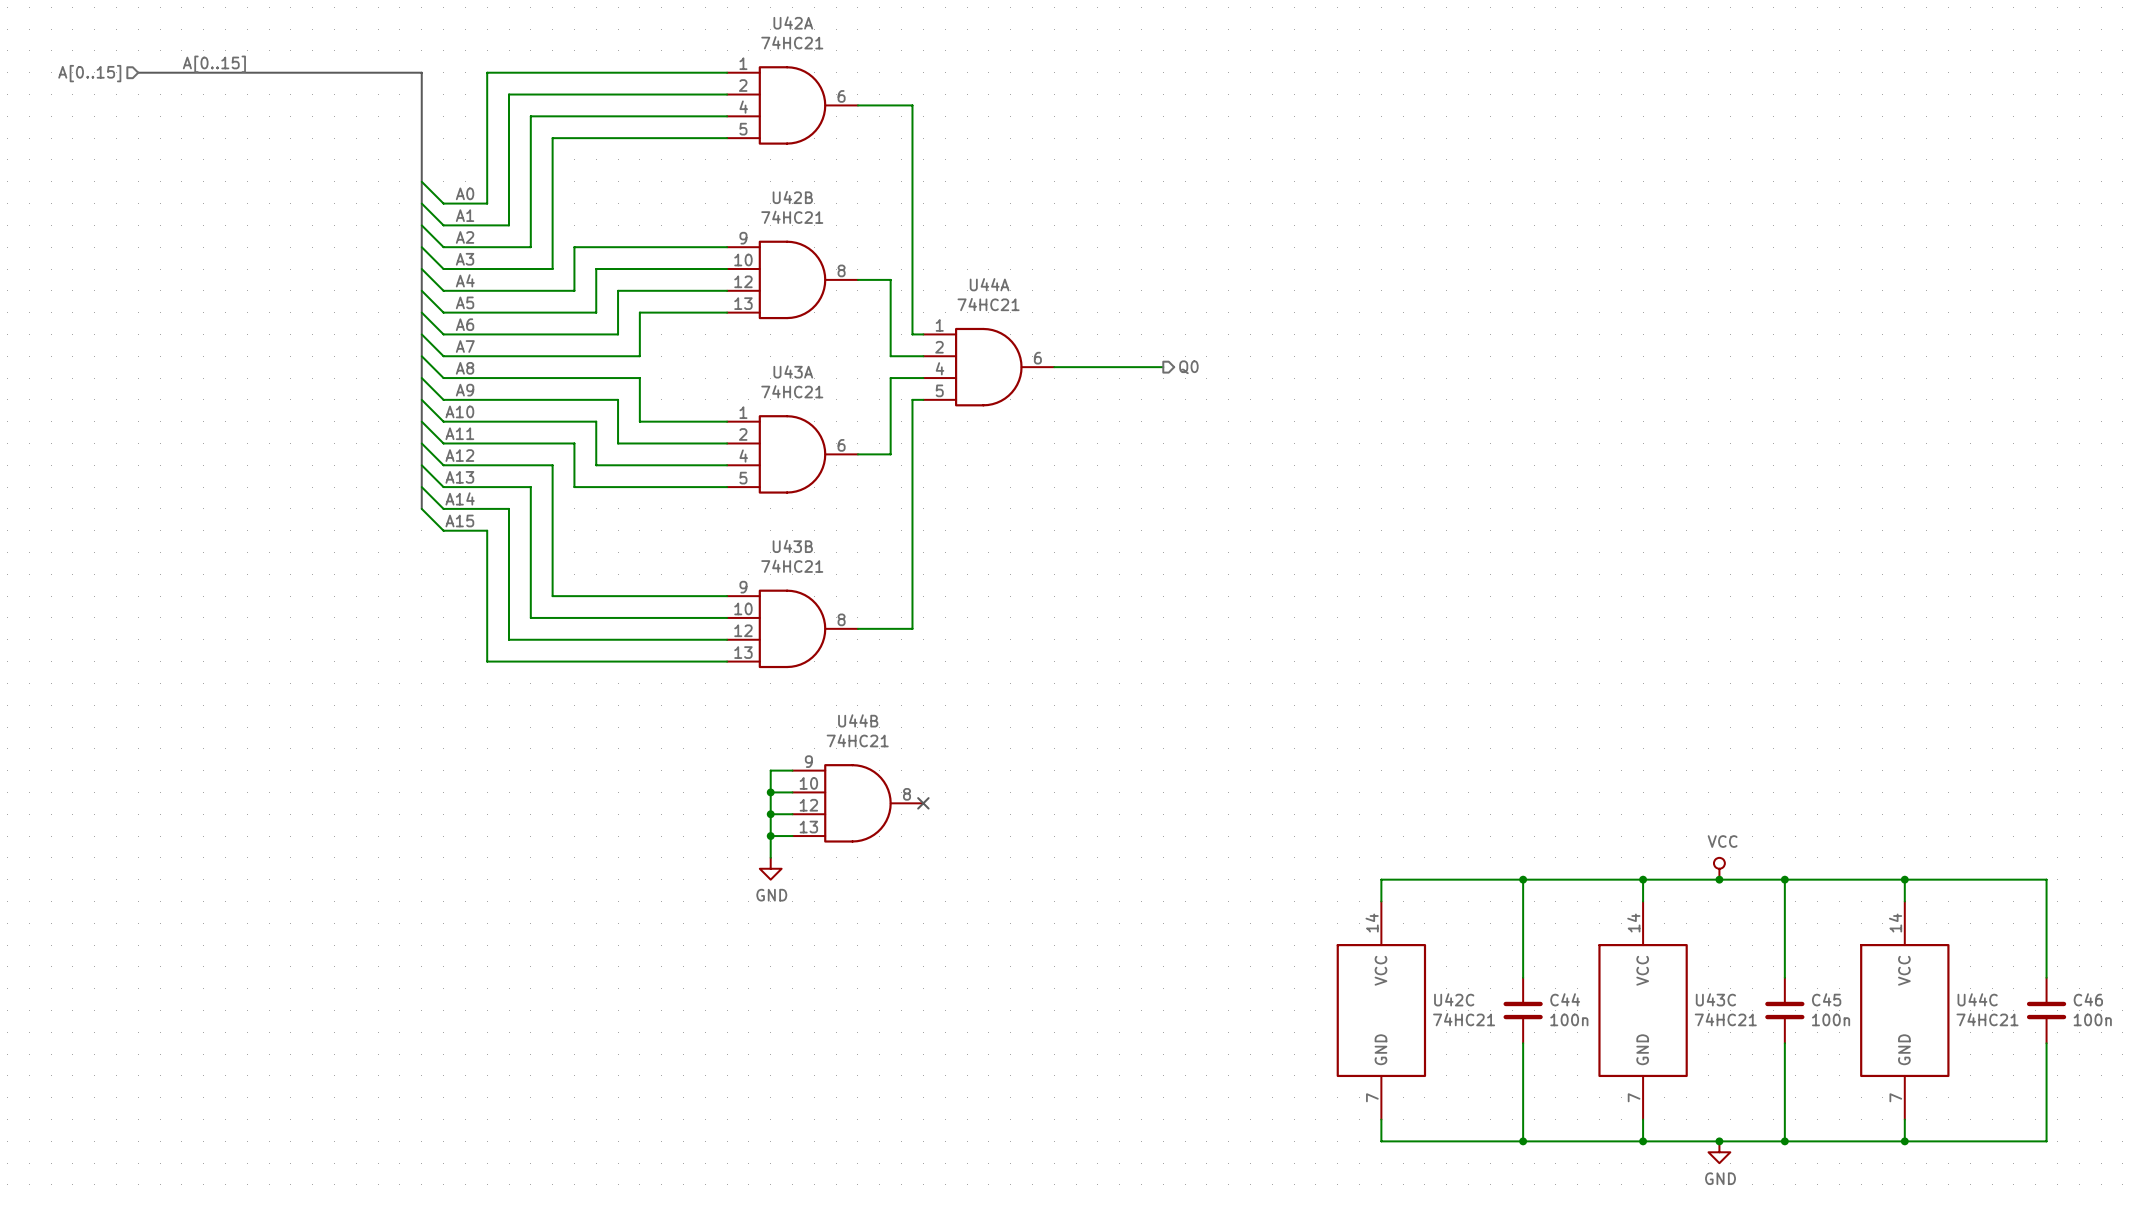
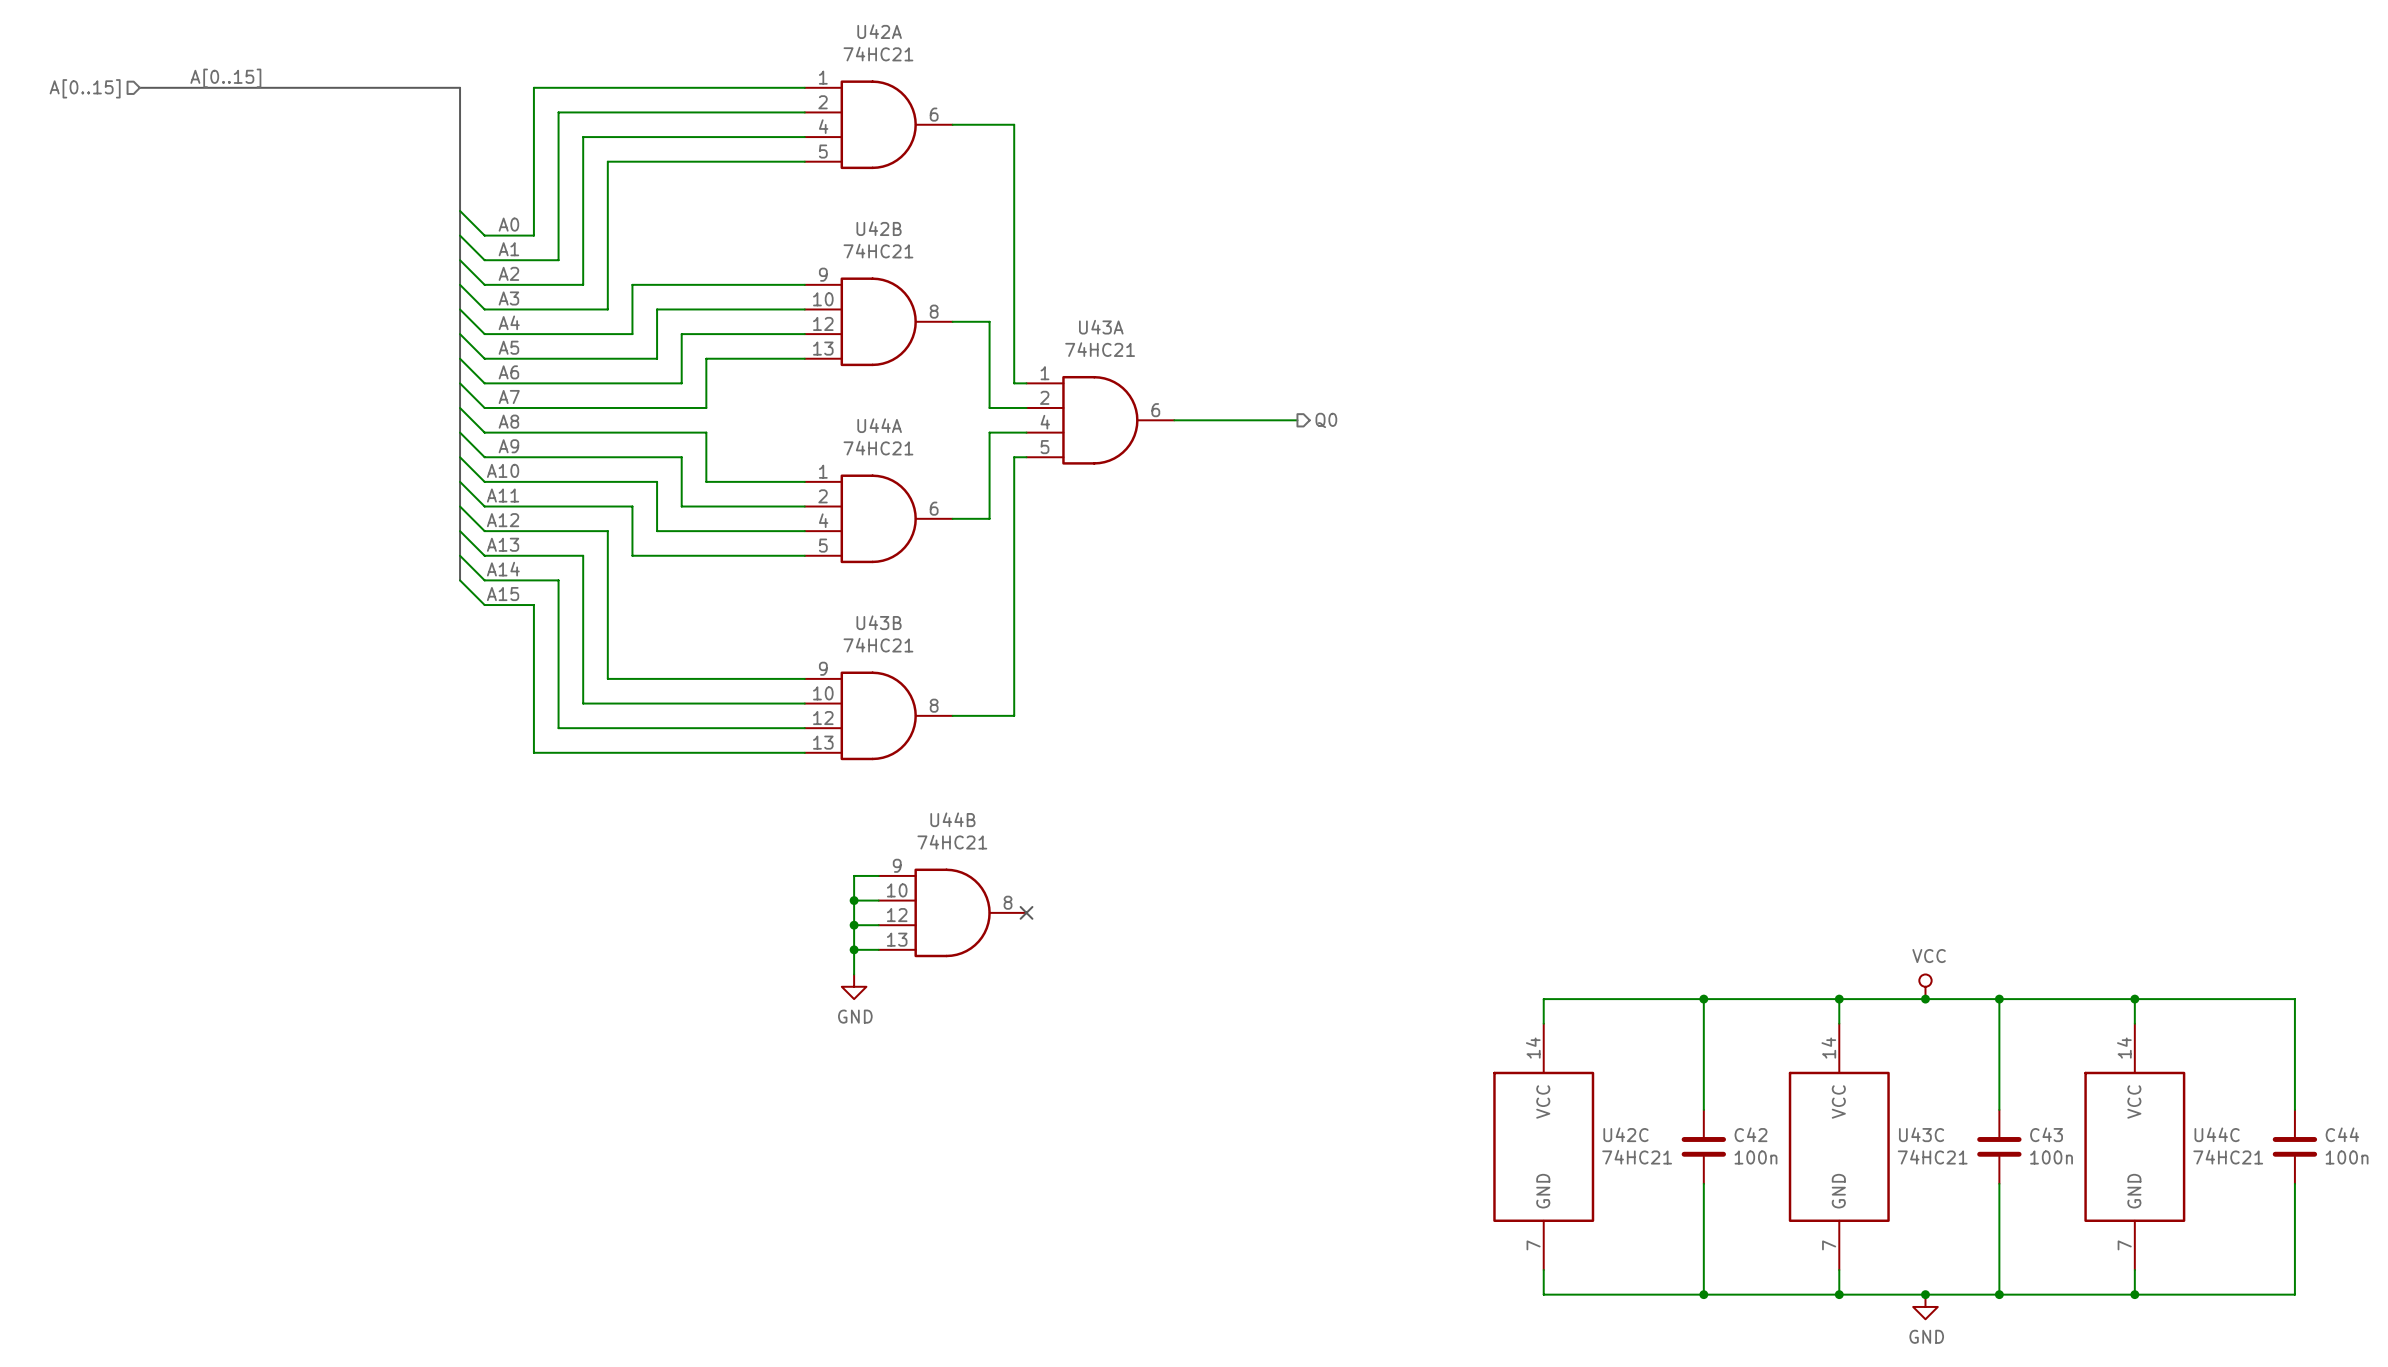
U44A name: U44A (989, 284) -> U43A (1101, 327)
U43A name: U43A (793, 371) -> U44A (879, 425)
C44 name: C44 (1565, 999) -> C42 (1751, 1134)
C45 name: C45 (1826, 999) -> C43 (2046, 1134)
C46 name: C46 (2088, 999) -> C44 (2342, 1134)

